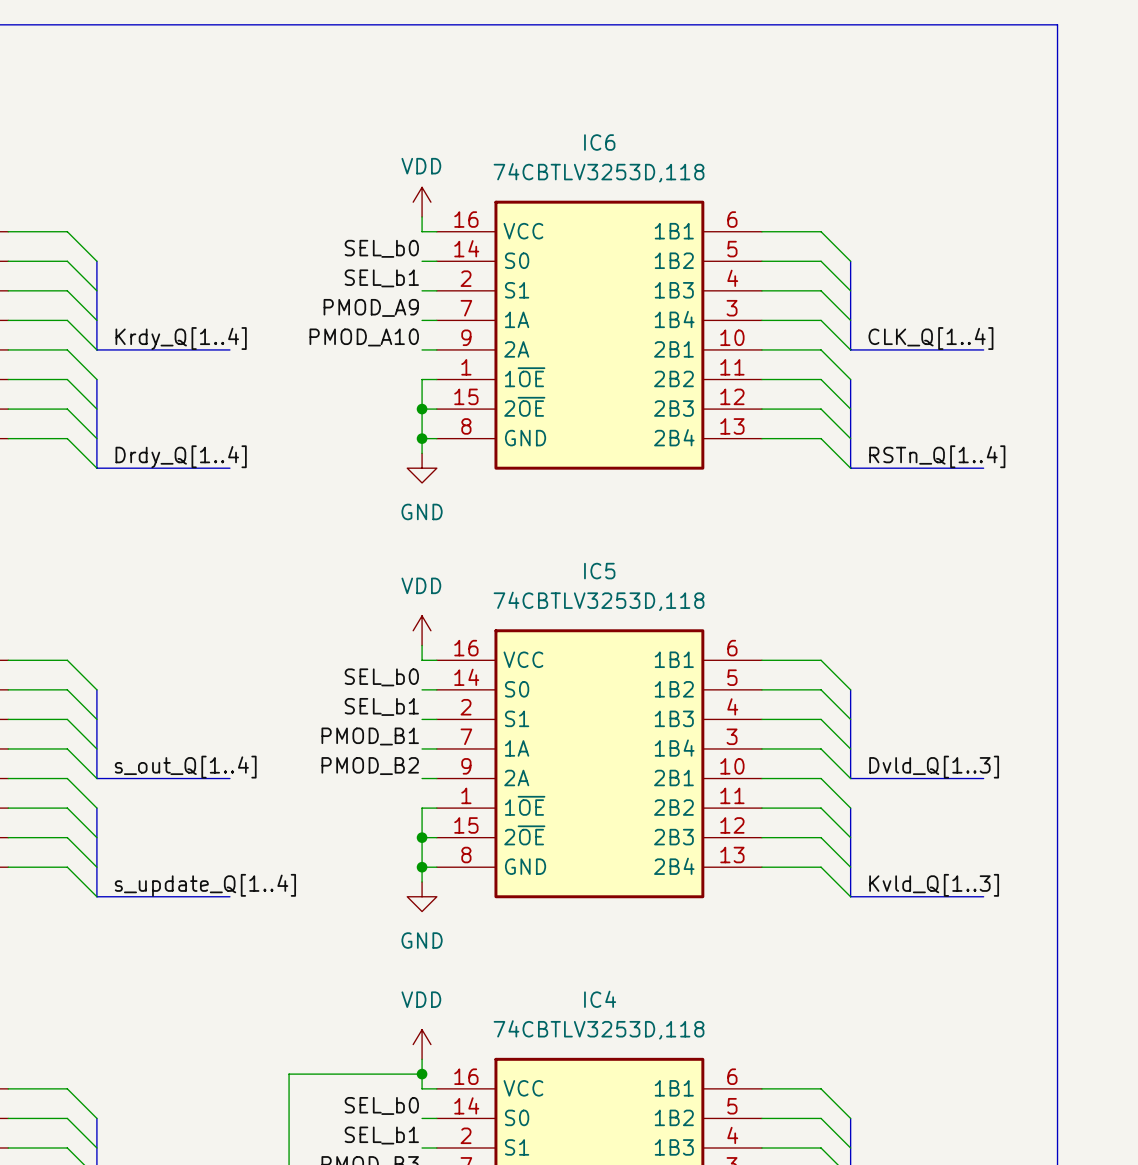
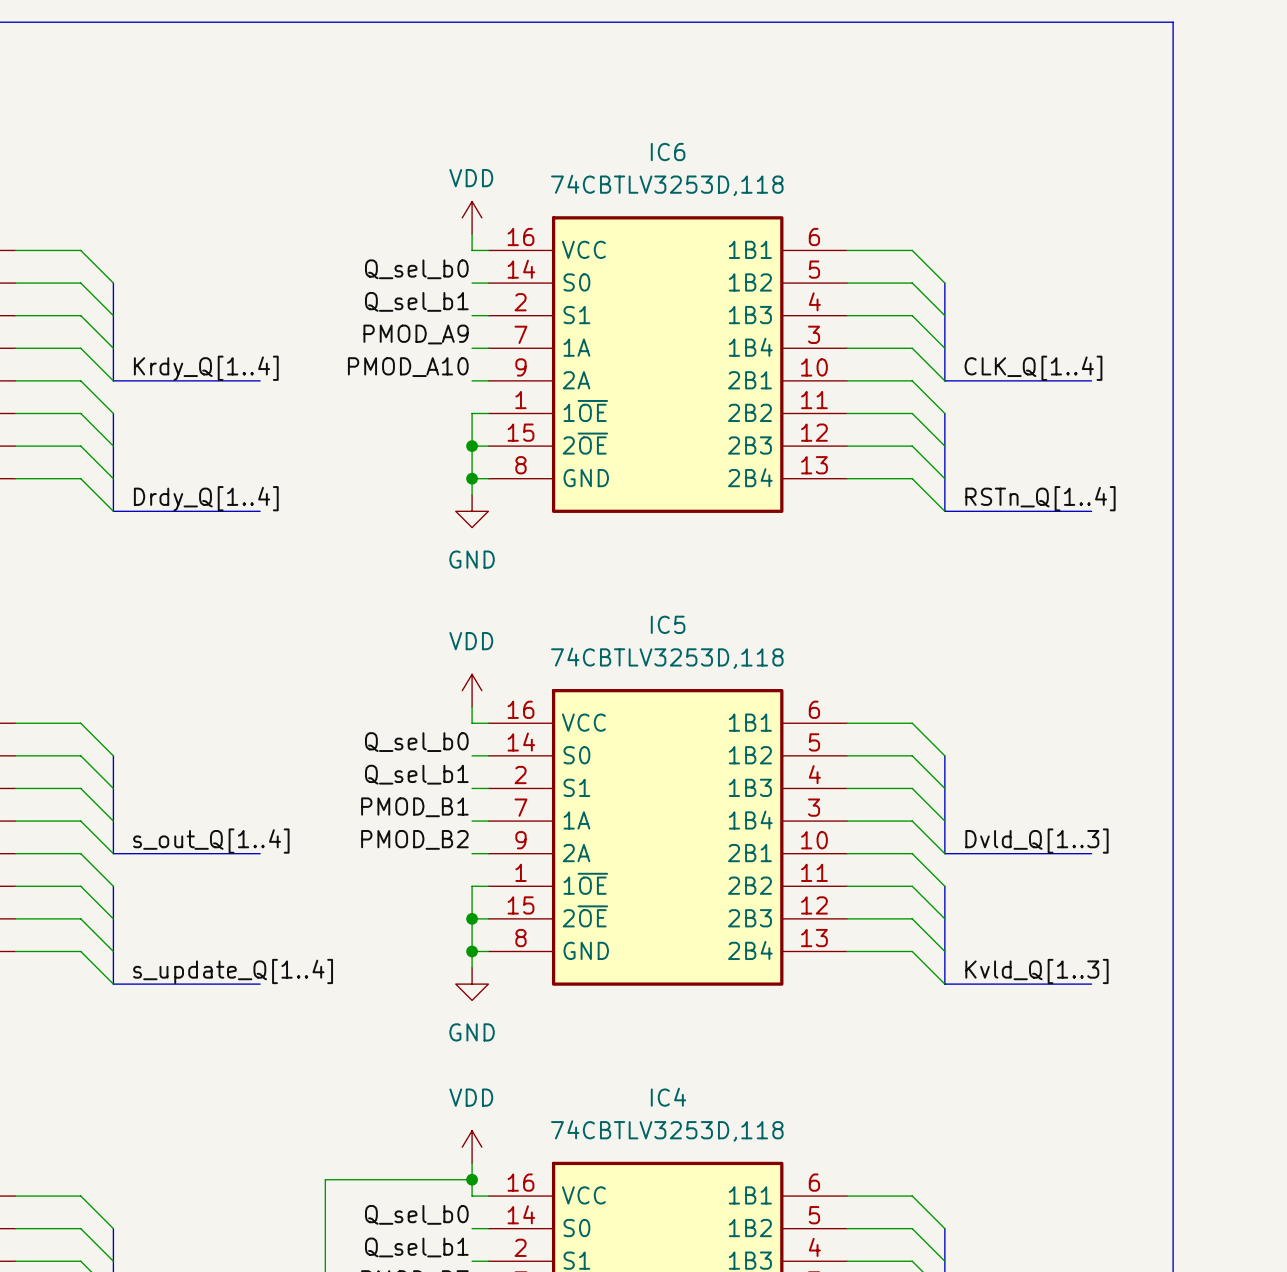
label: SEL_b0 (381, 248) -> Q_sel_b0 (416, 269)
label: SEL_b1 (381, 278) -> Q_sel_b1 (416, 301)
label: SEL_b0 (381, 677) -> Q_sel_b0 (416, 742)
label: SEL_b1 (381, 706) -> Q_sel_b1 (416, 774)
label: SEL_b0 (381, 1105) -> Q_sel_b0 (416, 1214)
label: SEL_b1 (381, 1135) -> Q_sel_b1 (416, 1247)

